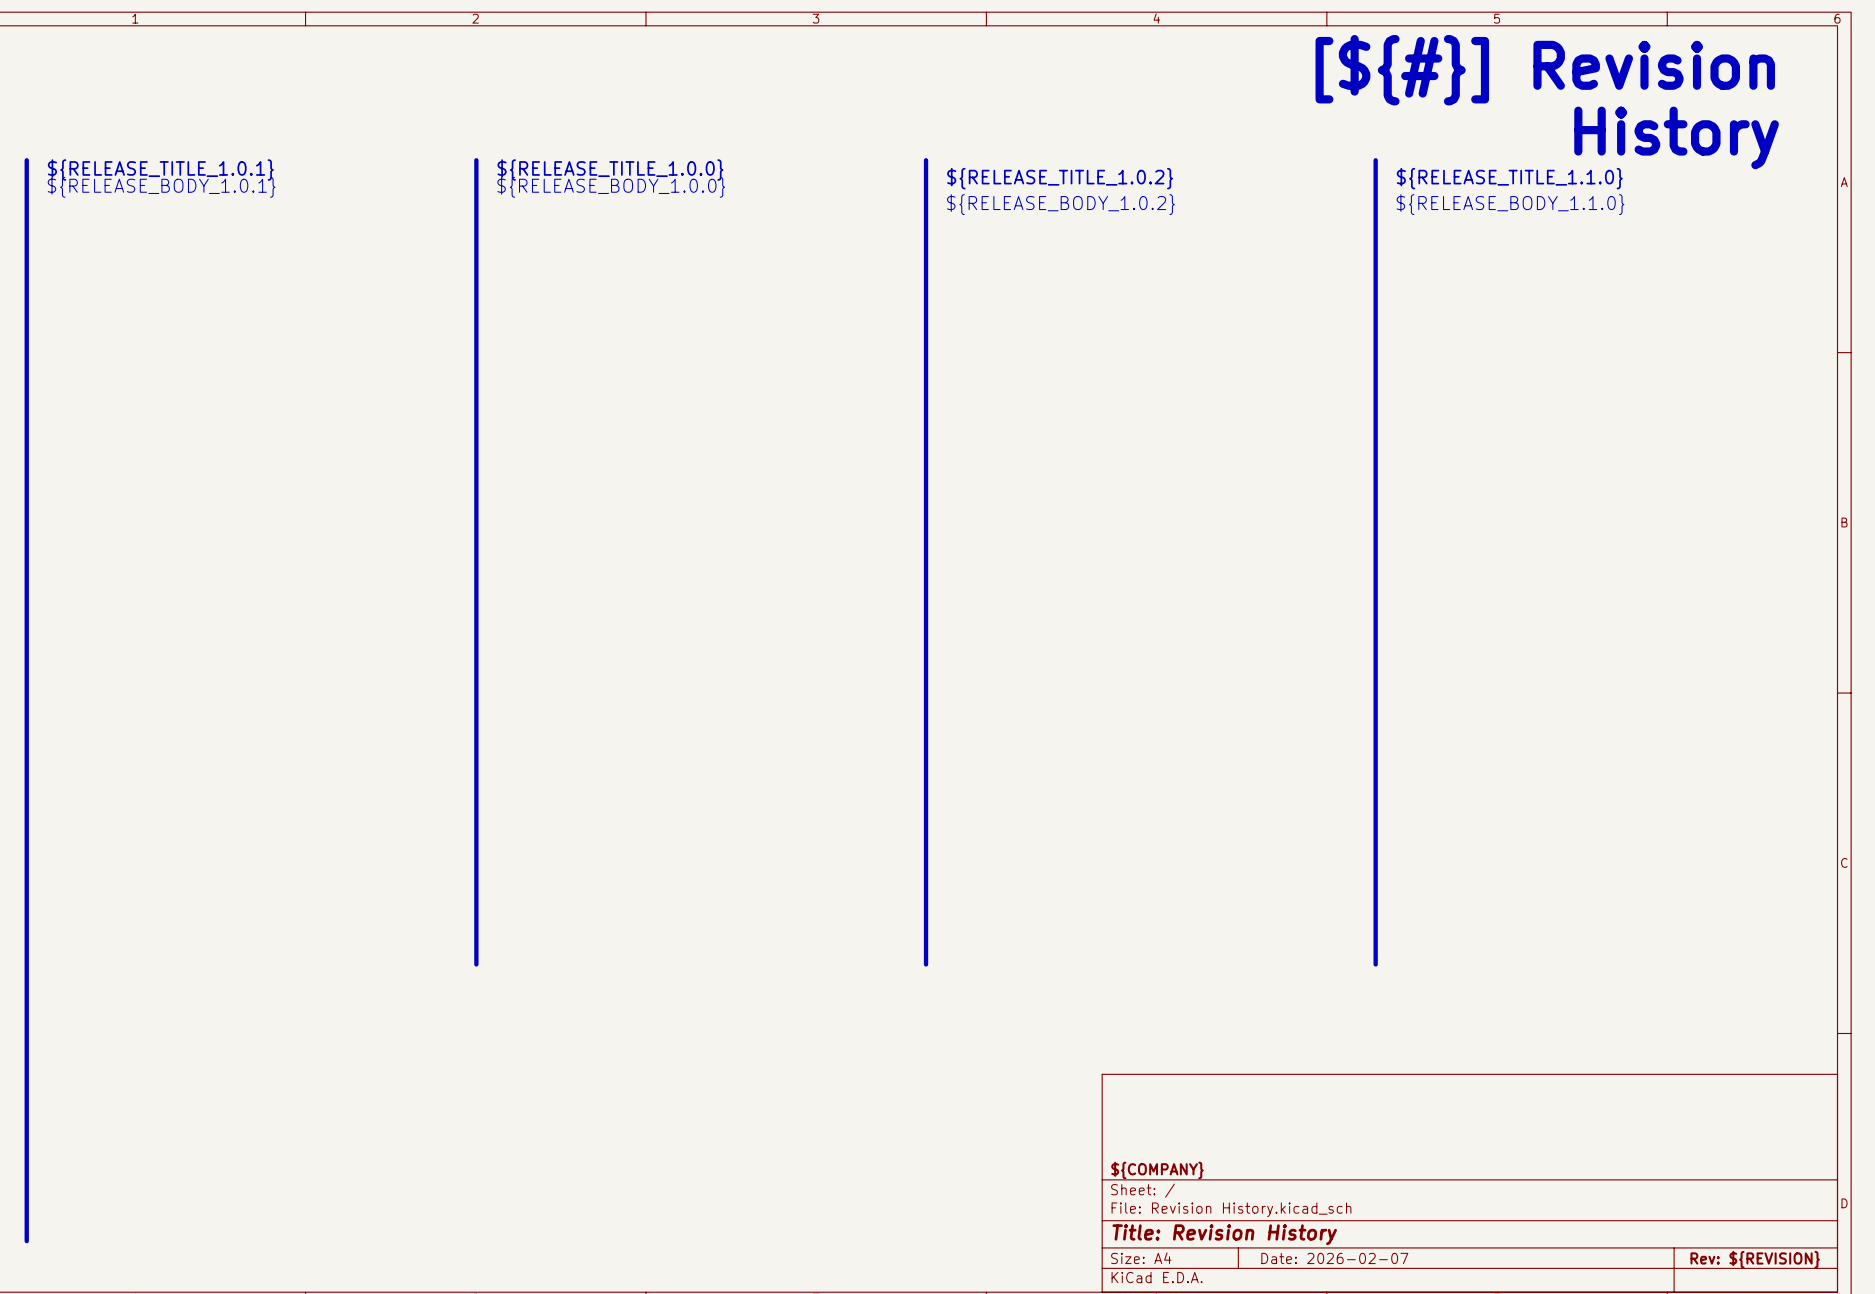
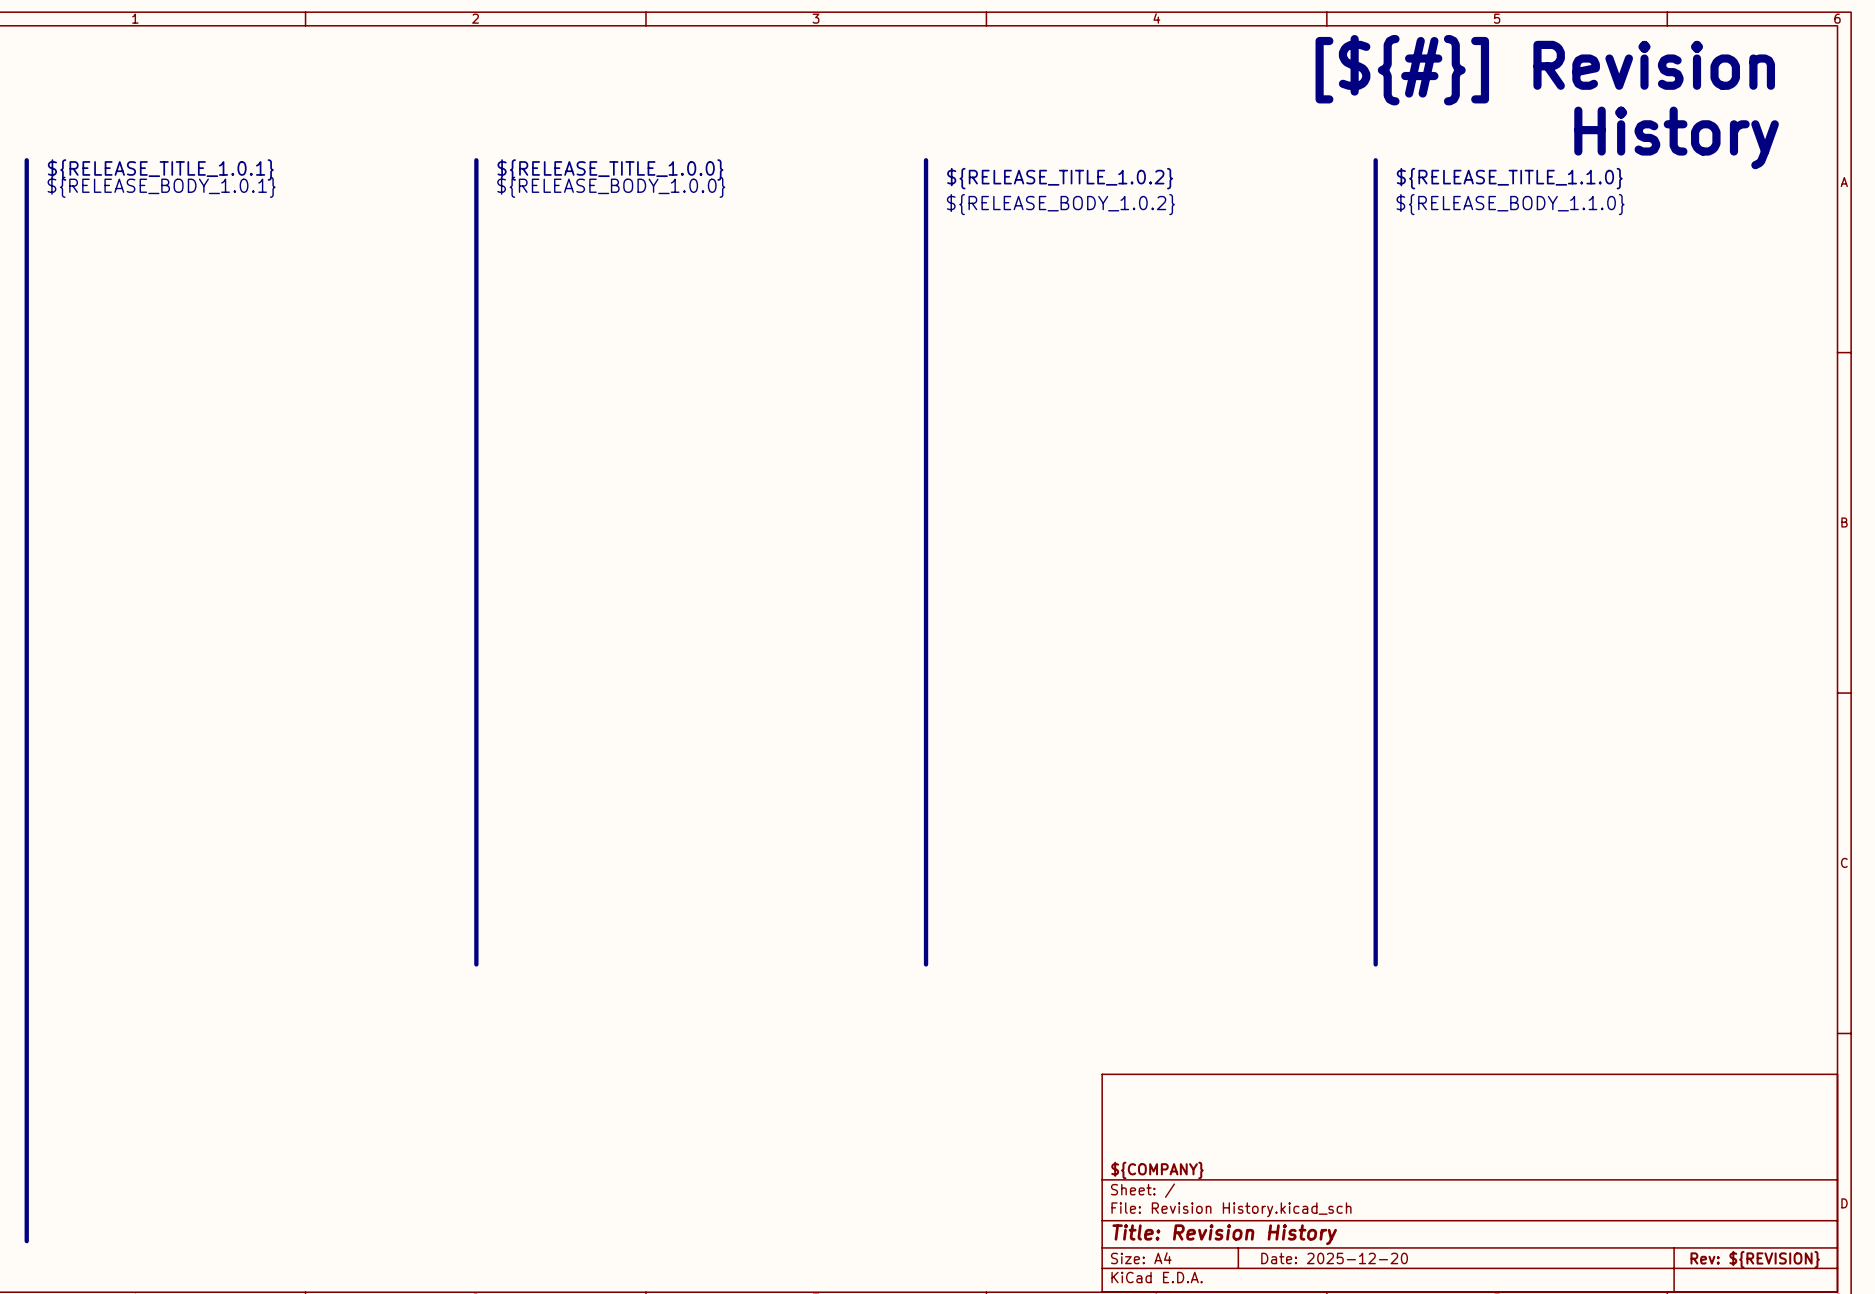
title block: Date: 2026-02-07 (1334, 1258) -> Date: 2025-12-20 (1334, 1258)

